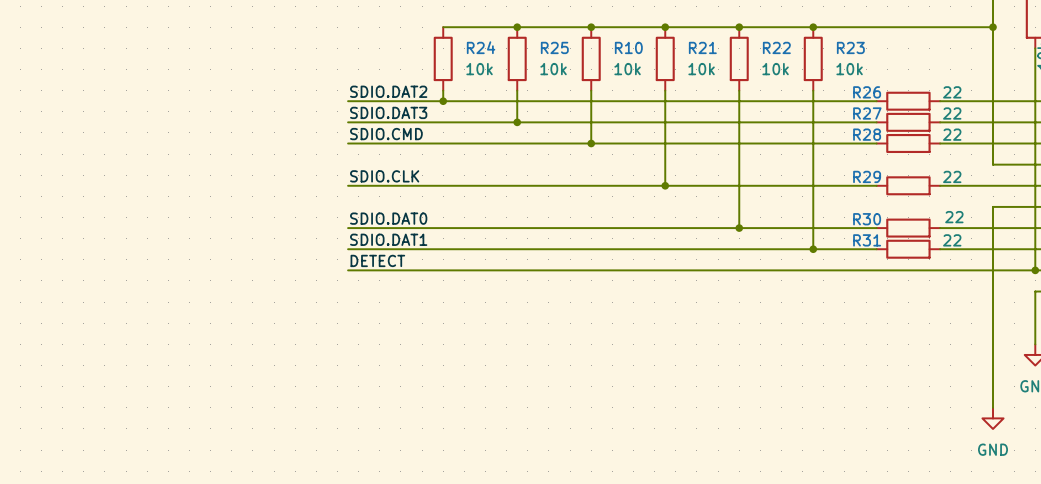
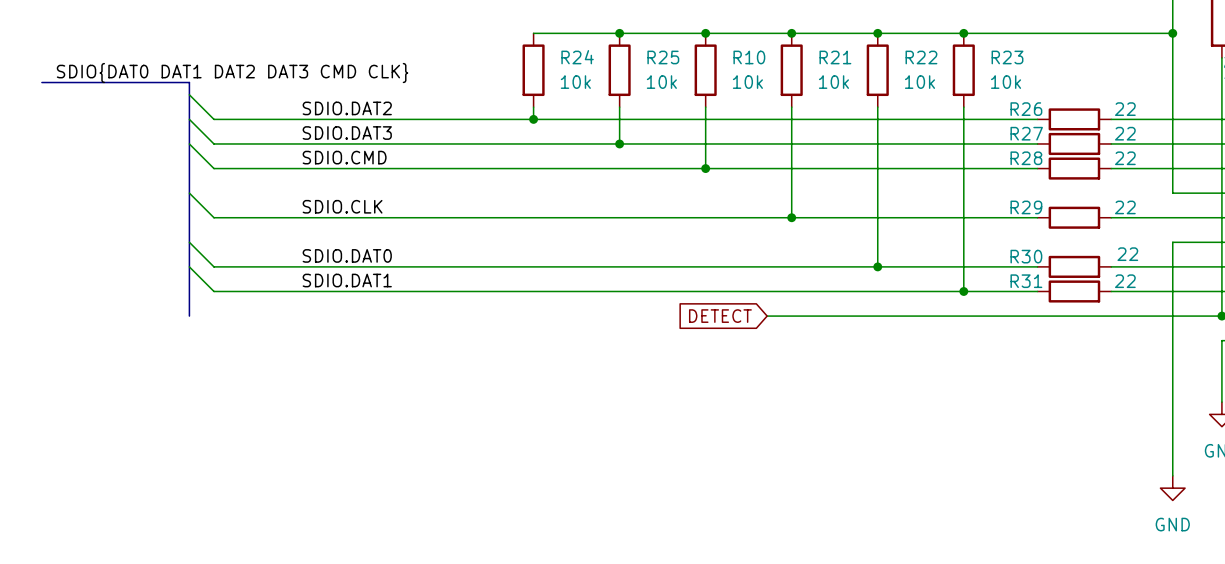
label: none -> SDIO{DAT0 DAT1 DAT2 DAT3 CMD CLK} (232, 73)
bus: none -> (41, 82) (189, 82) (189, 316)
wire: none -> (189, 94) (213, 119) (422, 119)
label position: SDIO.DAT2 (388, 91) -> SDIO.DAT2 (347, 108)
wire: none -> (189, 119) (213, 143) (422, 143)
label position: SDIO.DAT3 (388, 112) -> SDIO.DAT3 (347, 133)
wire: none -> (189, 143) (213, 168) (422, 168)
label position: SDIO.CMD (386, 134) -> SDIO.CMD (344, 157)
wire: none -> (189, 193) (213, 217) (422, 217)
label position: SDIO.CLK (384, 176) -> SDIO.CLK (342, 206)
wire: none -> (189, 242) (213, 266) (422, 266)
label position: SDIO.DAT0 (388, 218) -> SDIO.DAT0 (347, 255)
wire: none -> (189, 266) (213, 291) (422, 291)
label position: SDIO.DAT1 (388, 239) -> SDIO.DAT1 (347, 280)
label: DETECT (377, 260) -> none
wire: (348, 270) (644, 270) -> none
global label: none -> DETECT (720, 316)

